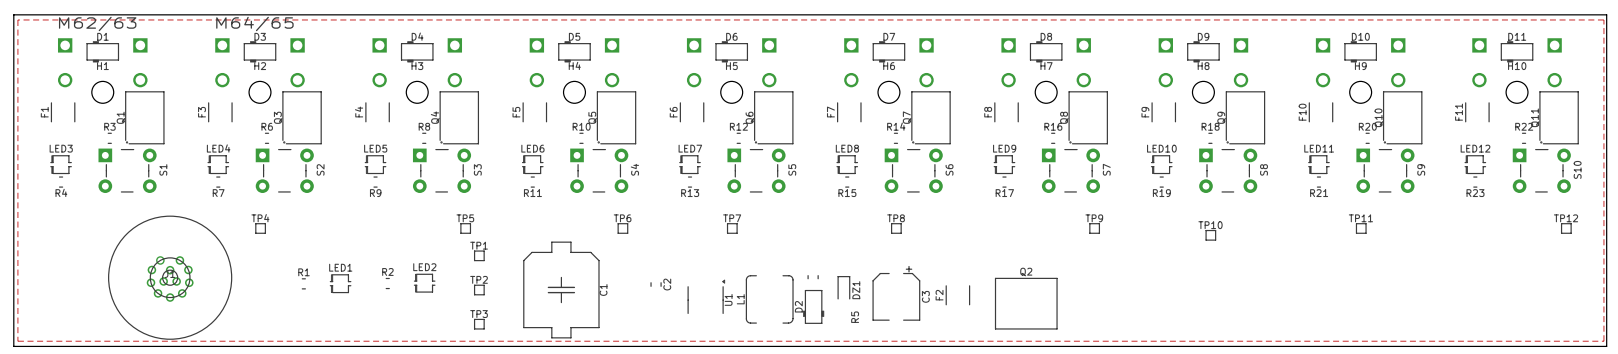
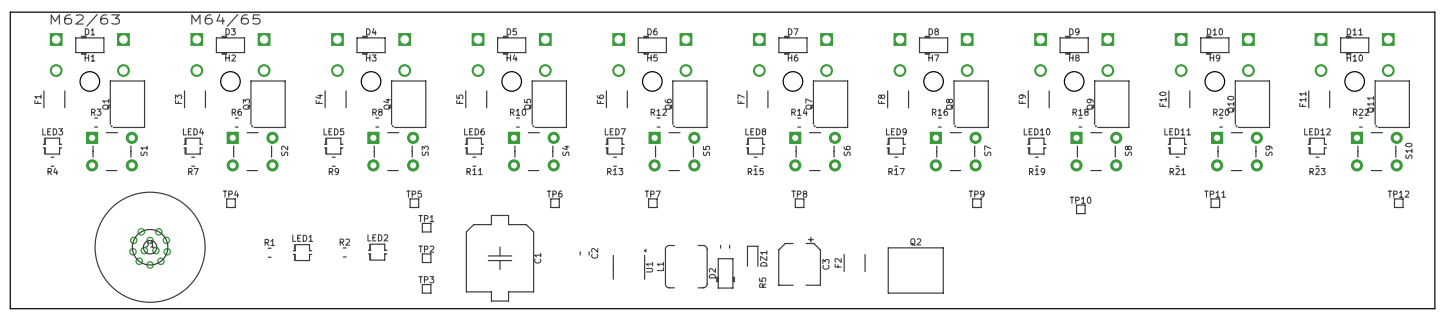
zone outline: (17, 19) (17, 341) (1603, 341) (1603, 19) (17, 19) -> none

